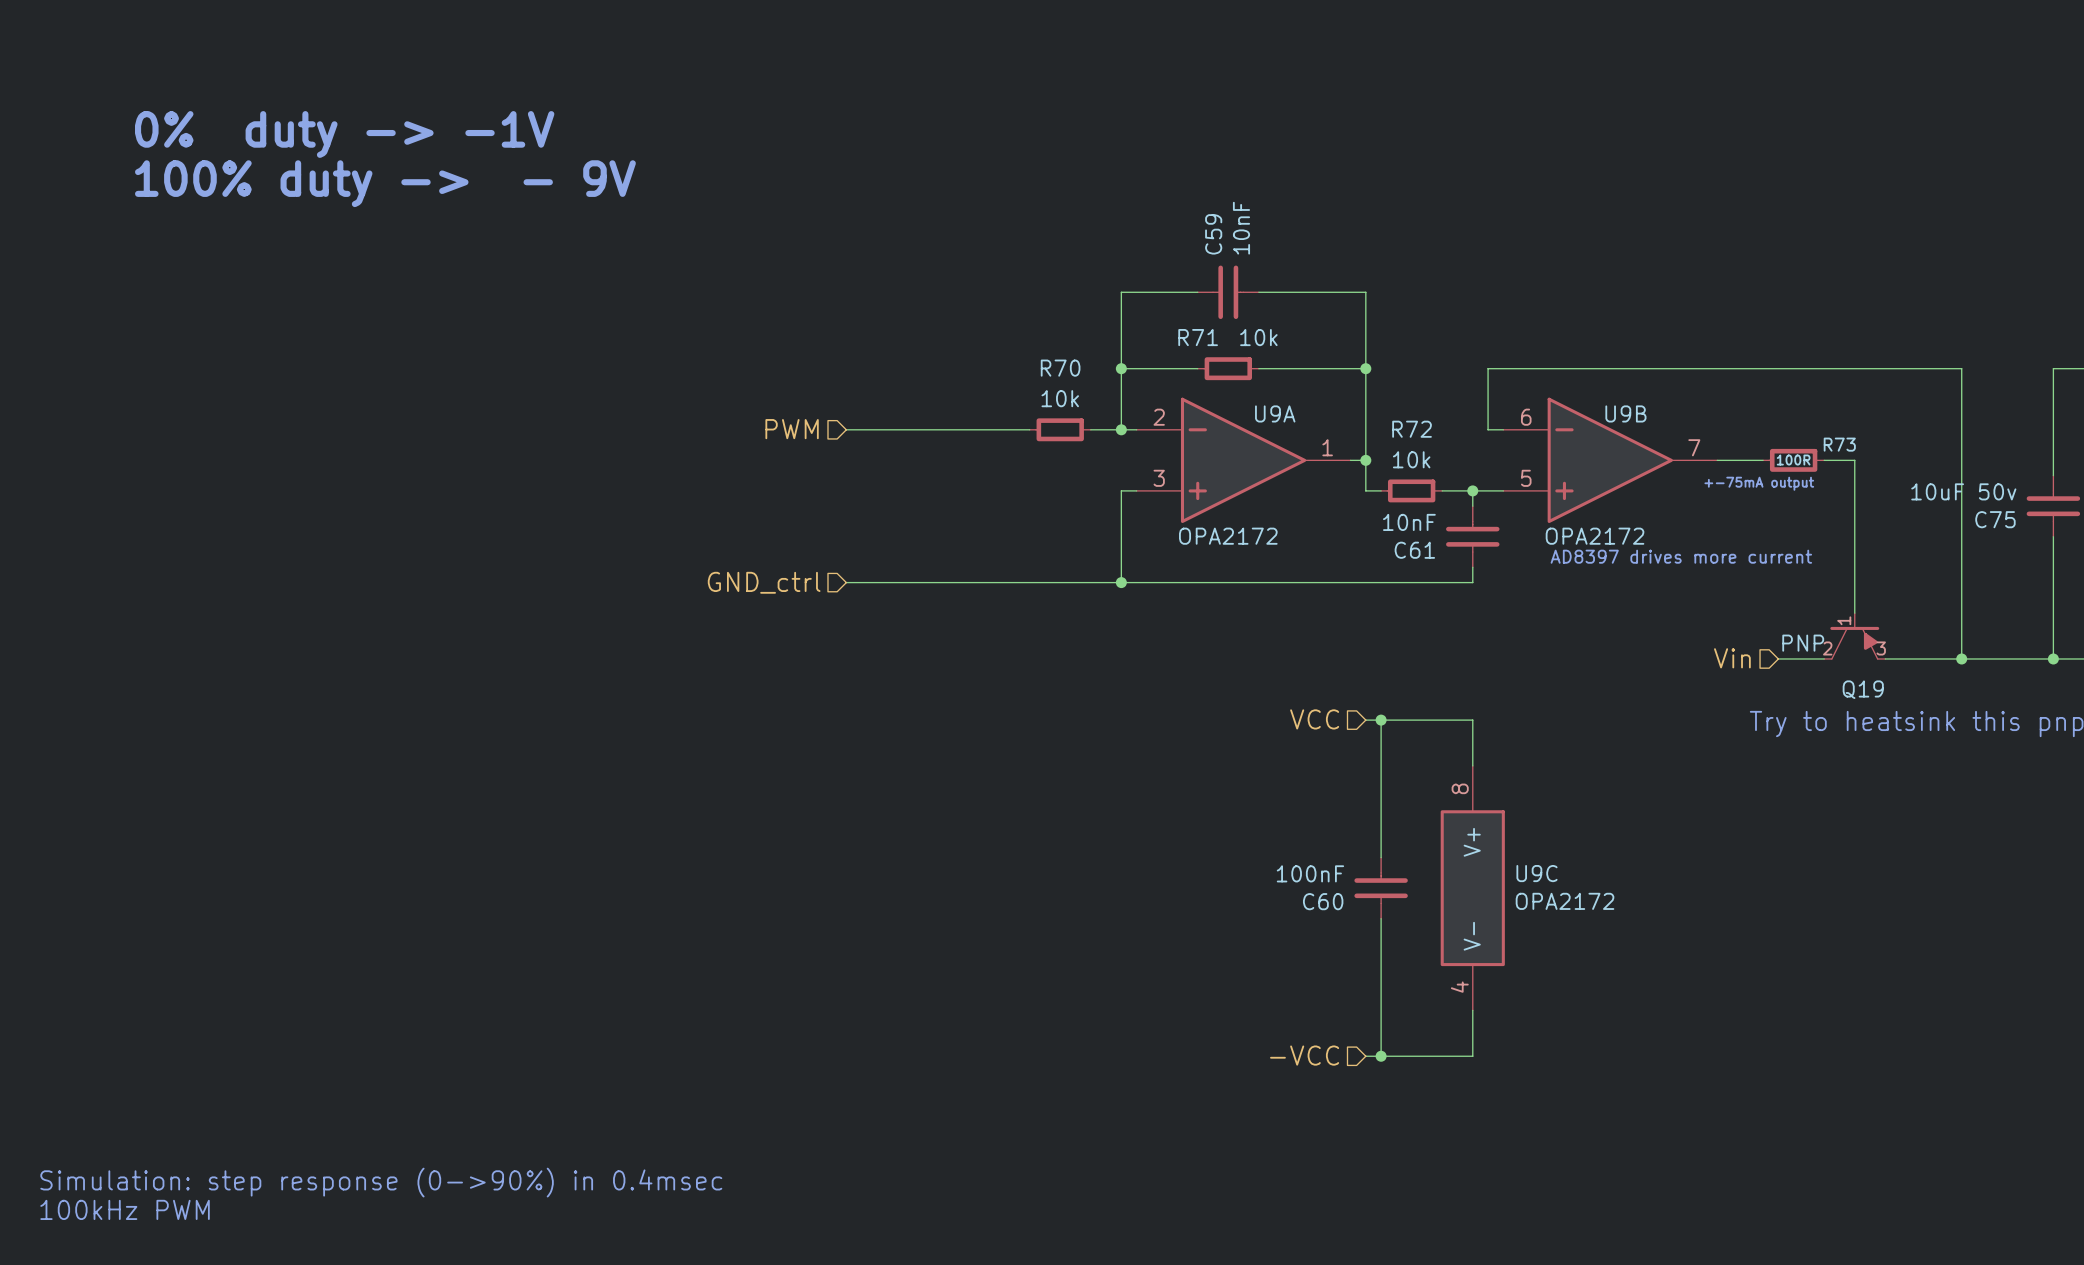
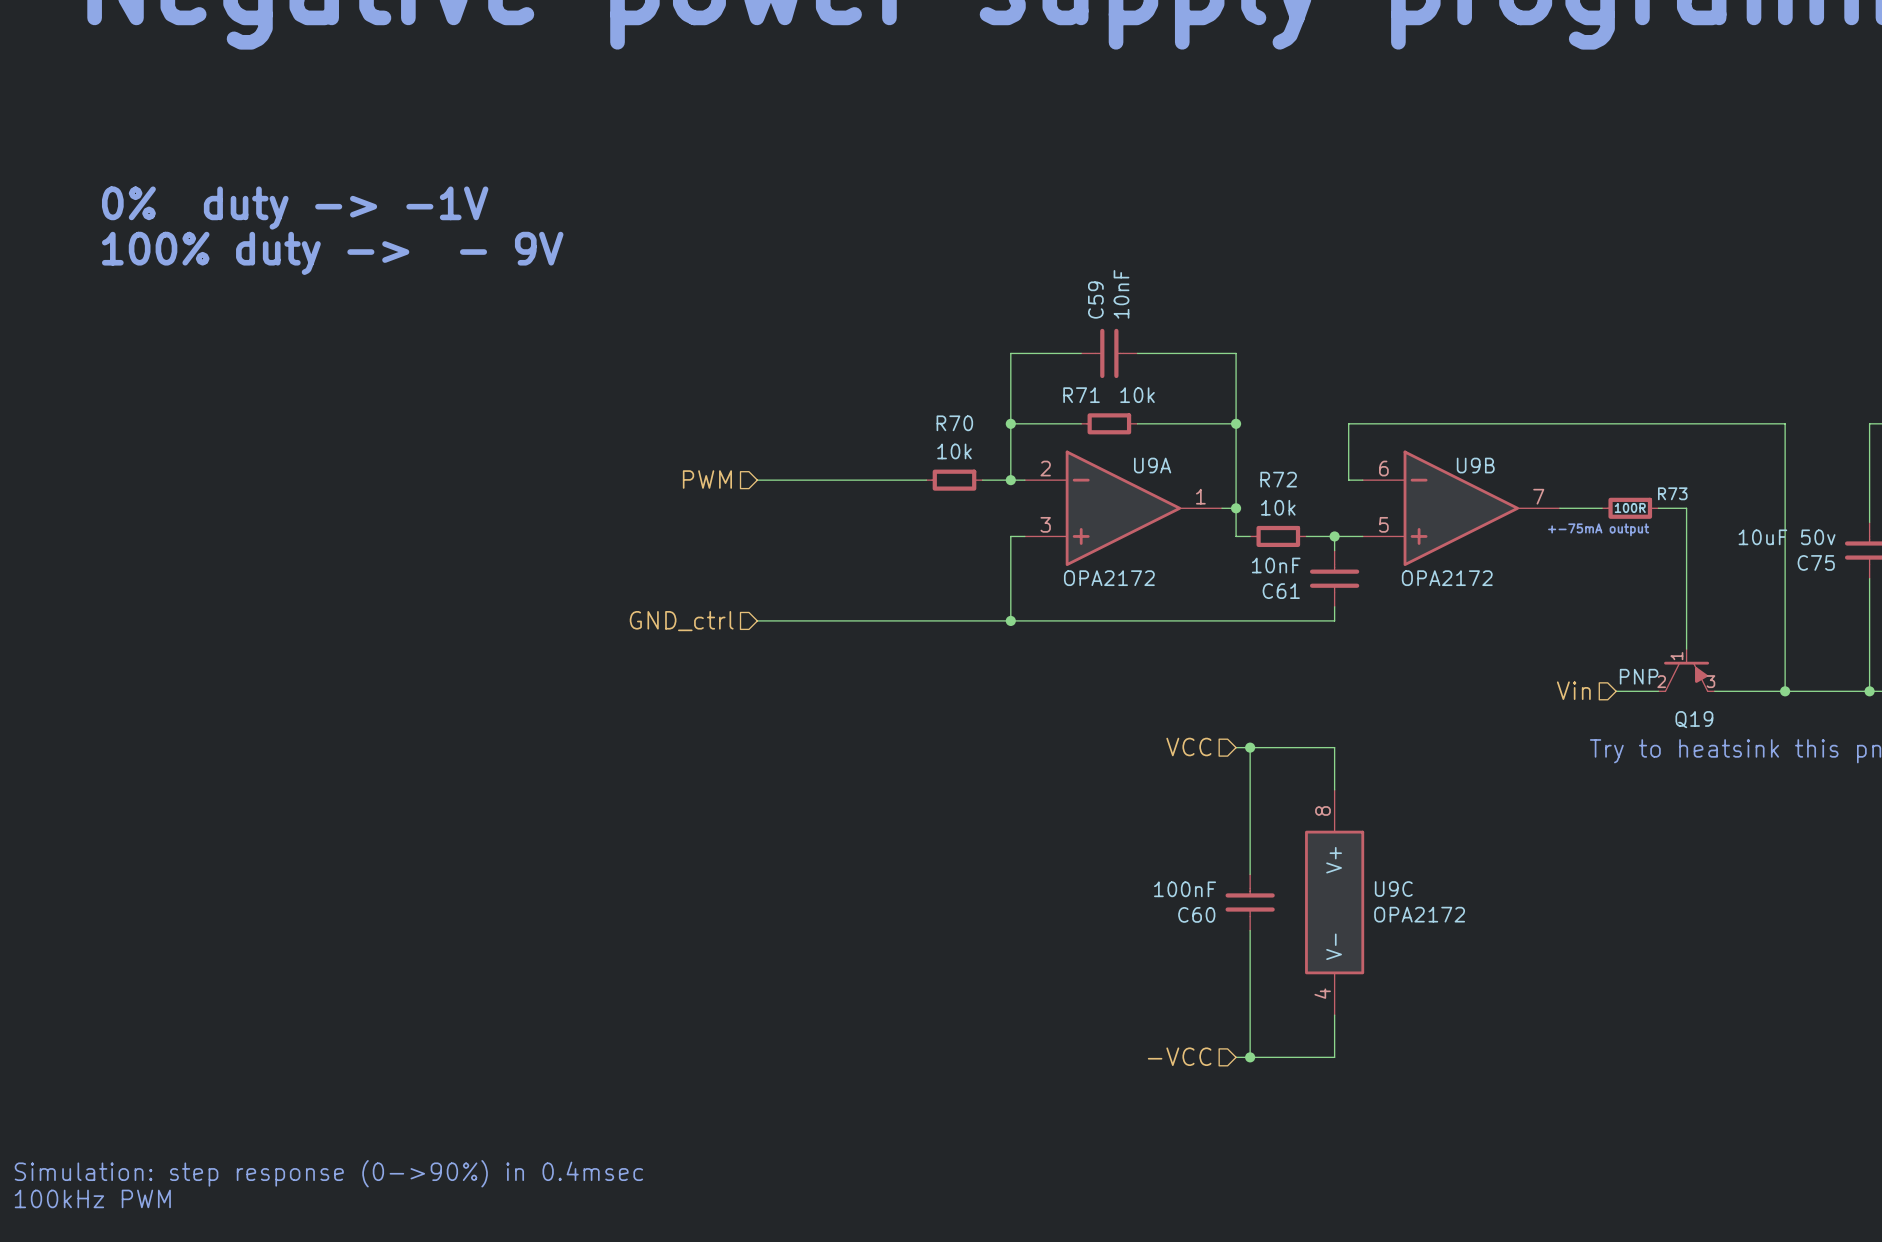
text: AD8397 drives more current (1681, 556) -> none

